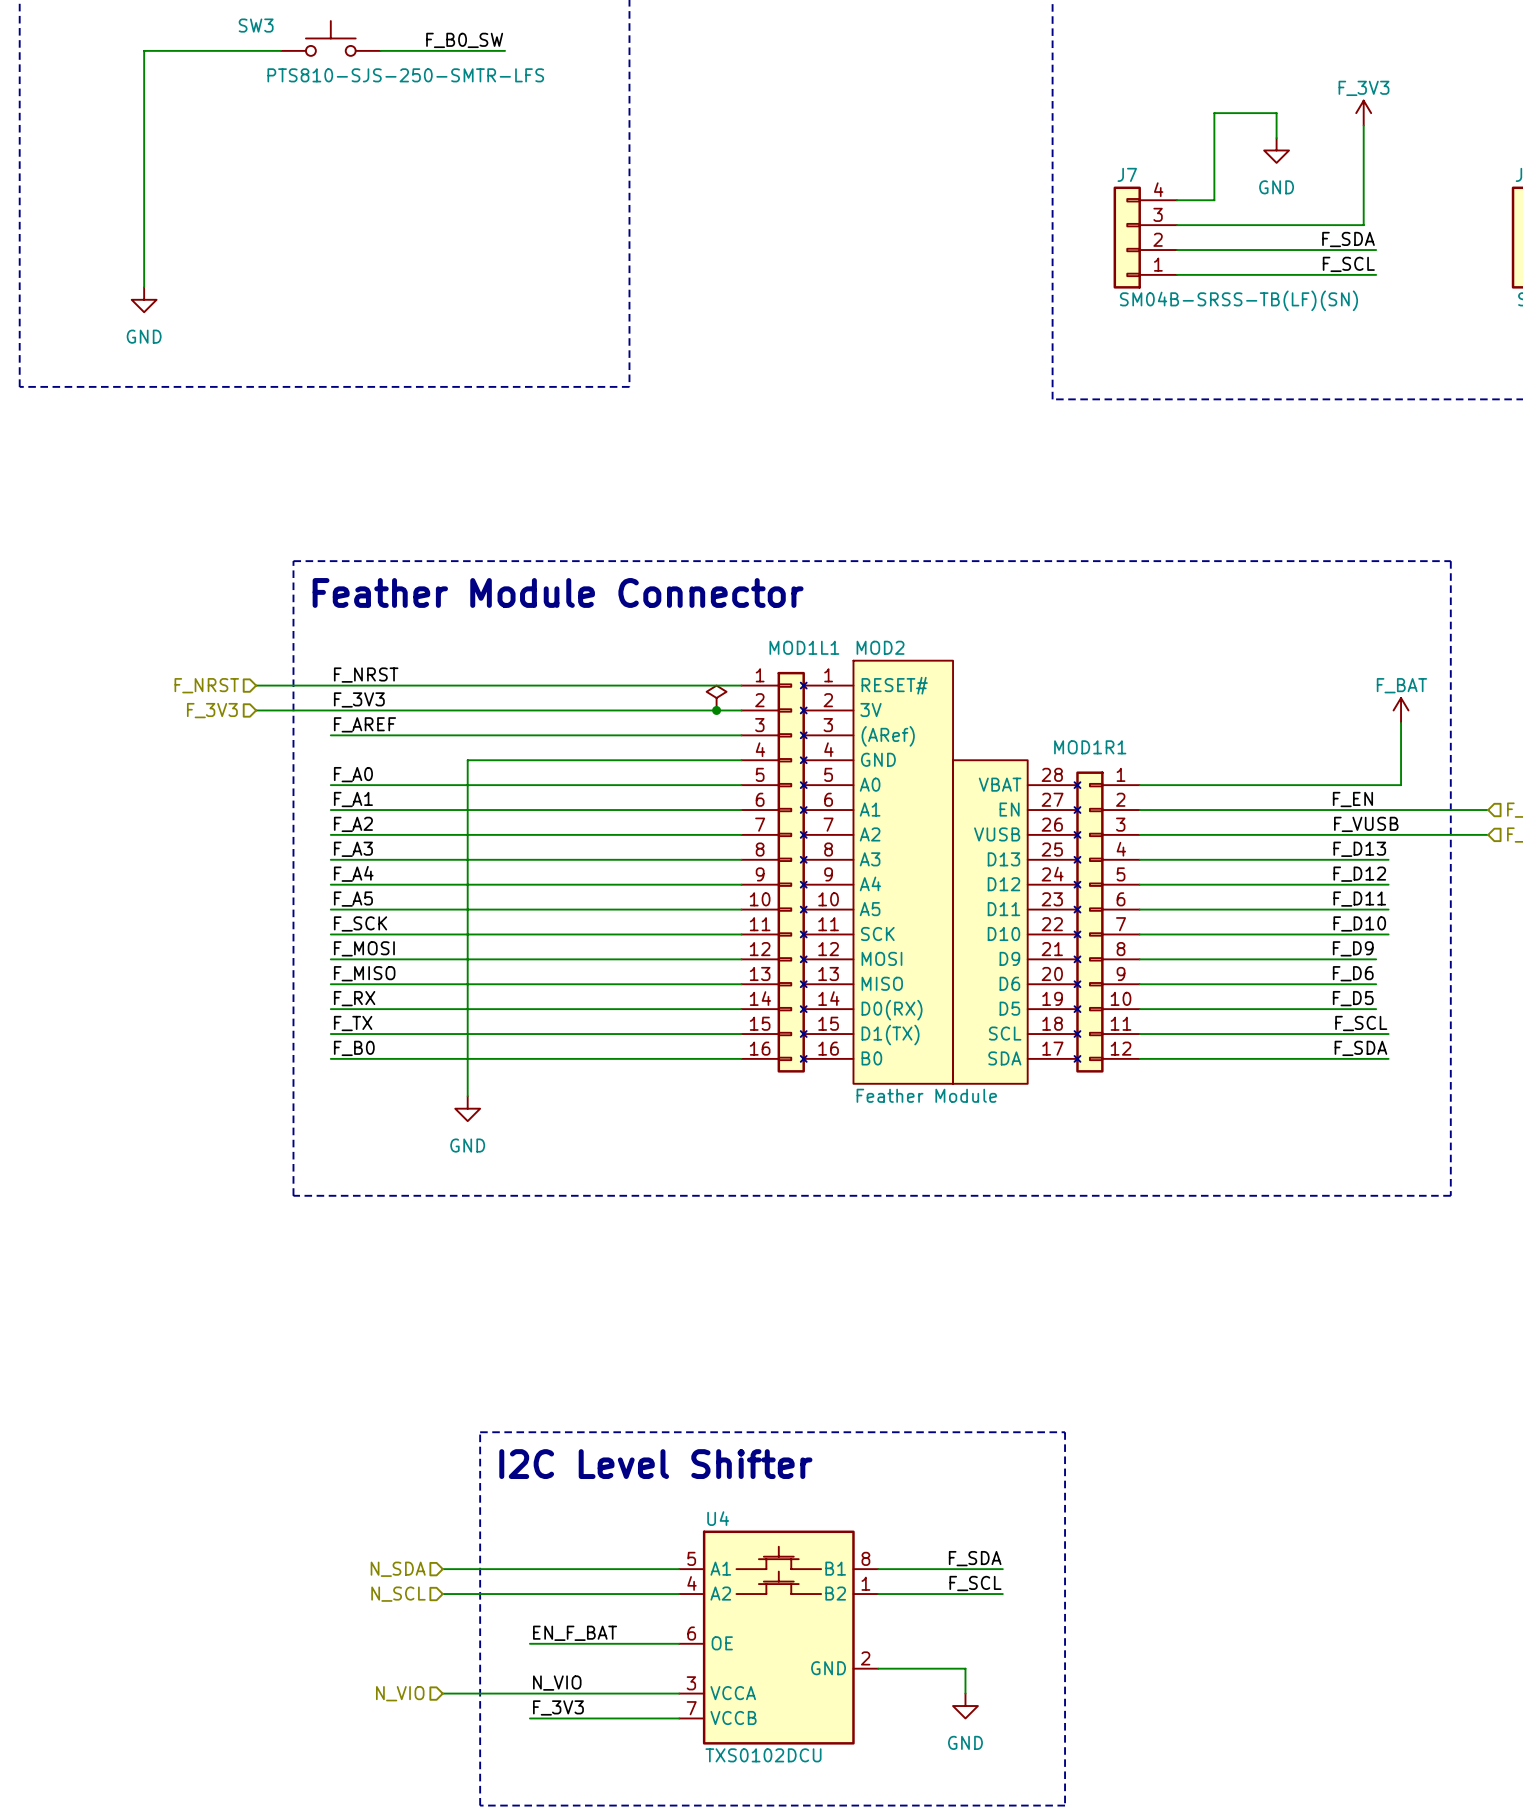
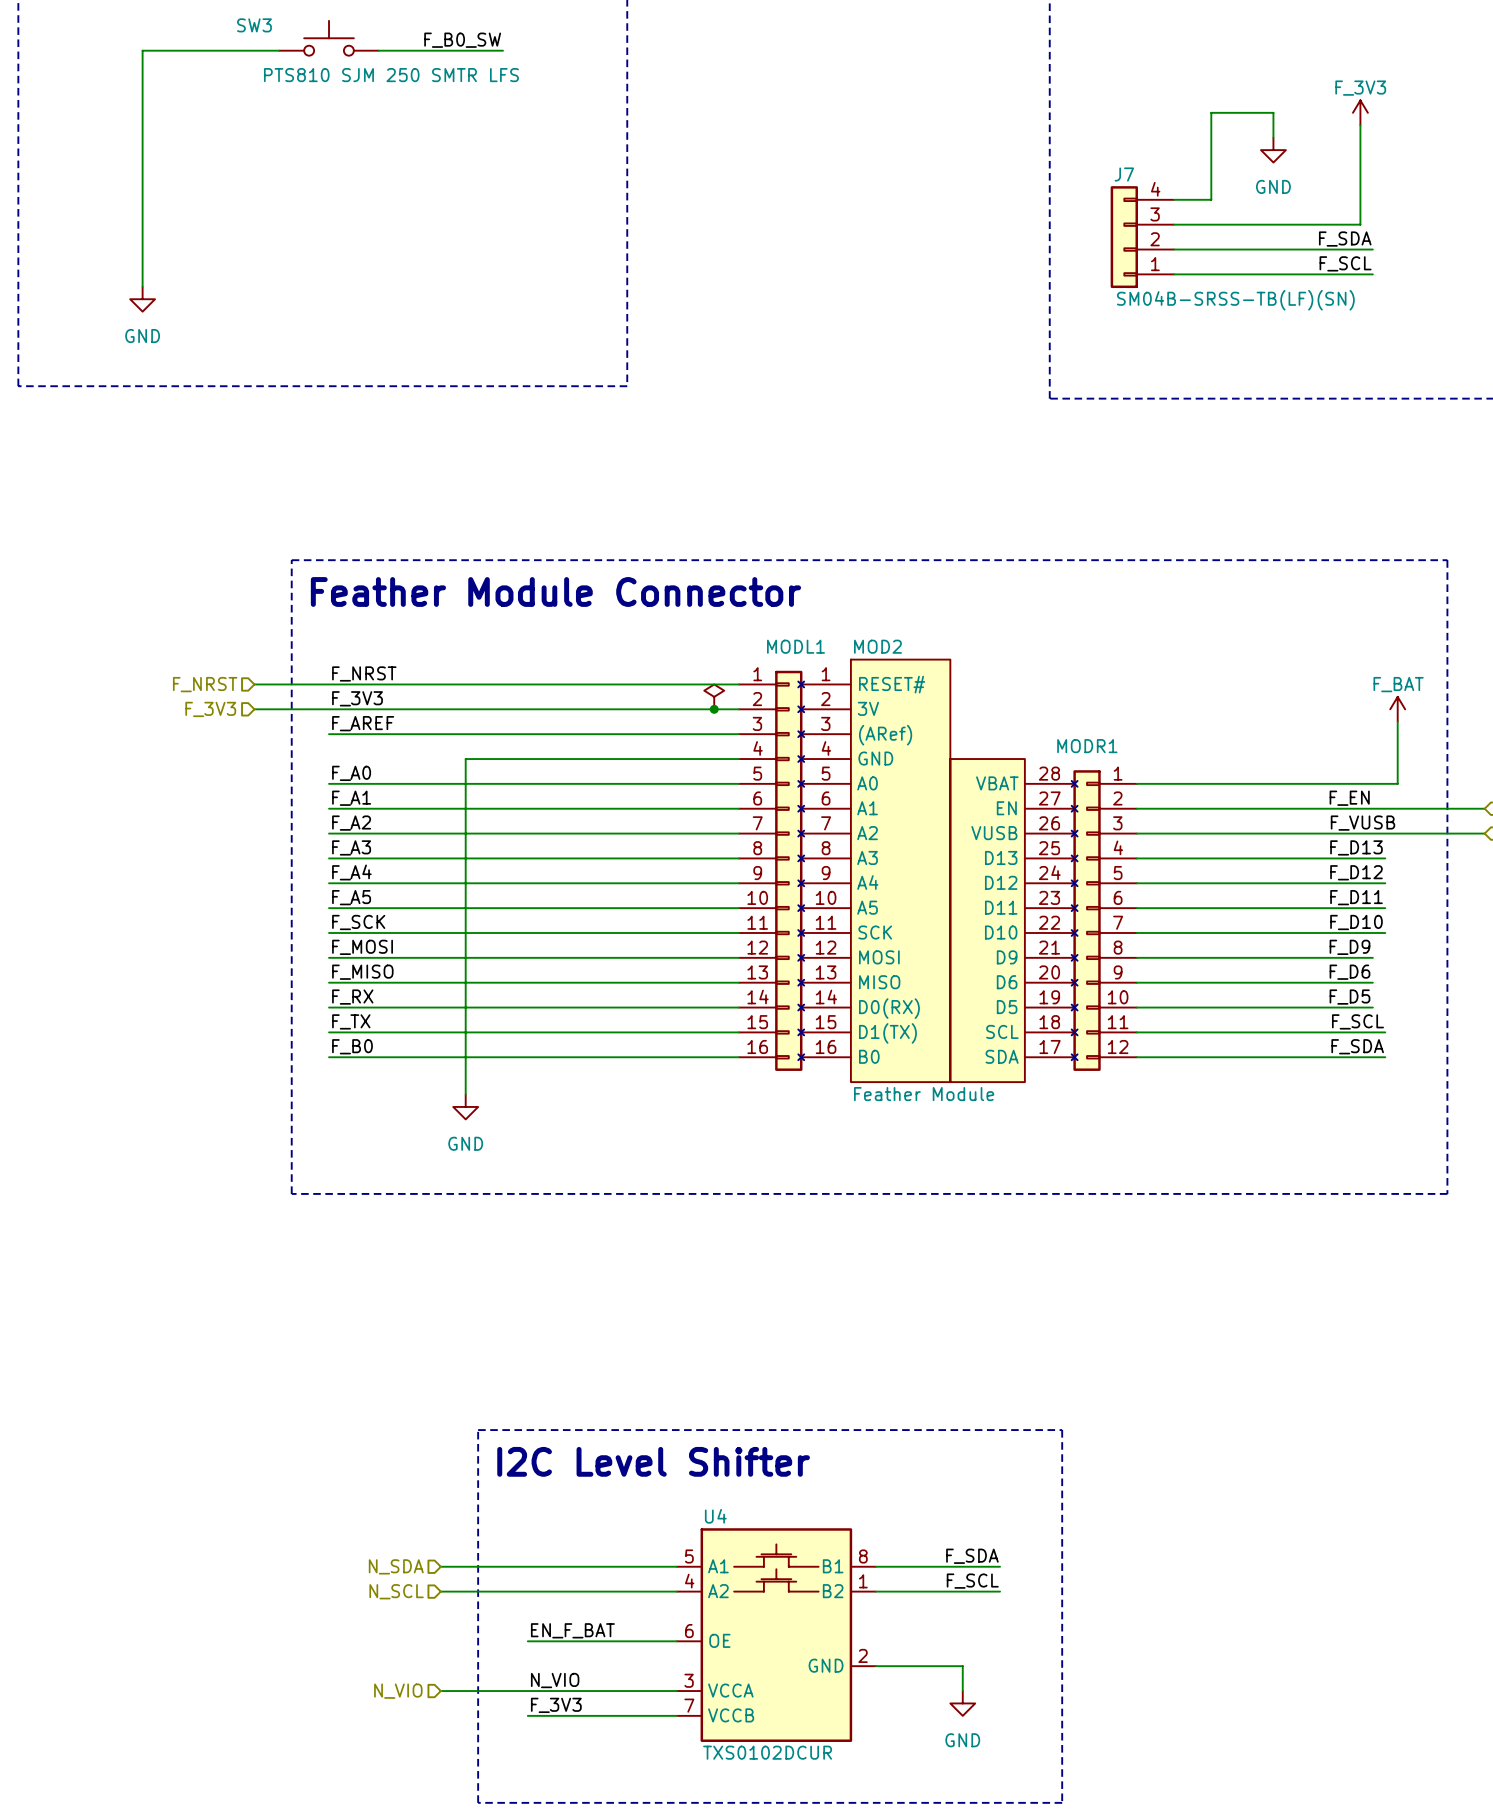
SW3 value: PTS810-SJS-250-SMTR-LFS (405, 75) -> PTS810 SJM 250 SMTR LFS (391, 75)
MOD1L1 name: MOD1L1 (804, 647) -> MODL1 (795, 646)
MOD1R1 name: MOD1R1 (1090, 747) -> MODR1 (1087, 746)
U4 value: TXS0102DCU (763, 1755) -> TXS0102DCUR (767, 1752)

